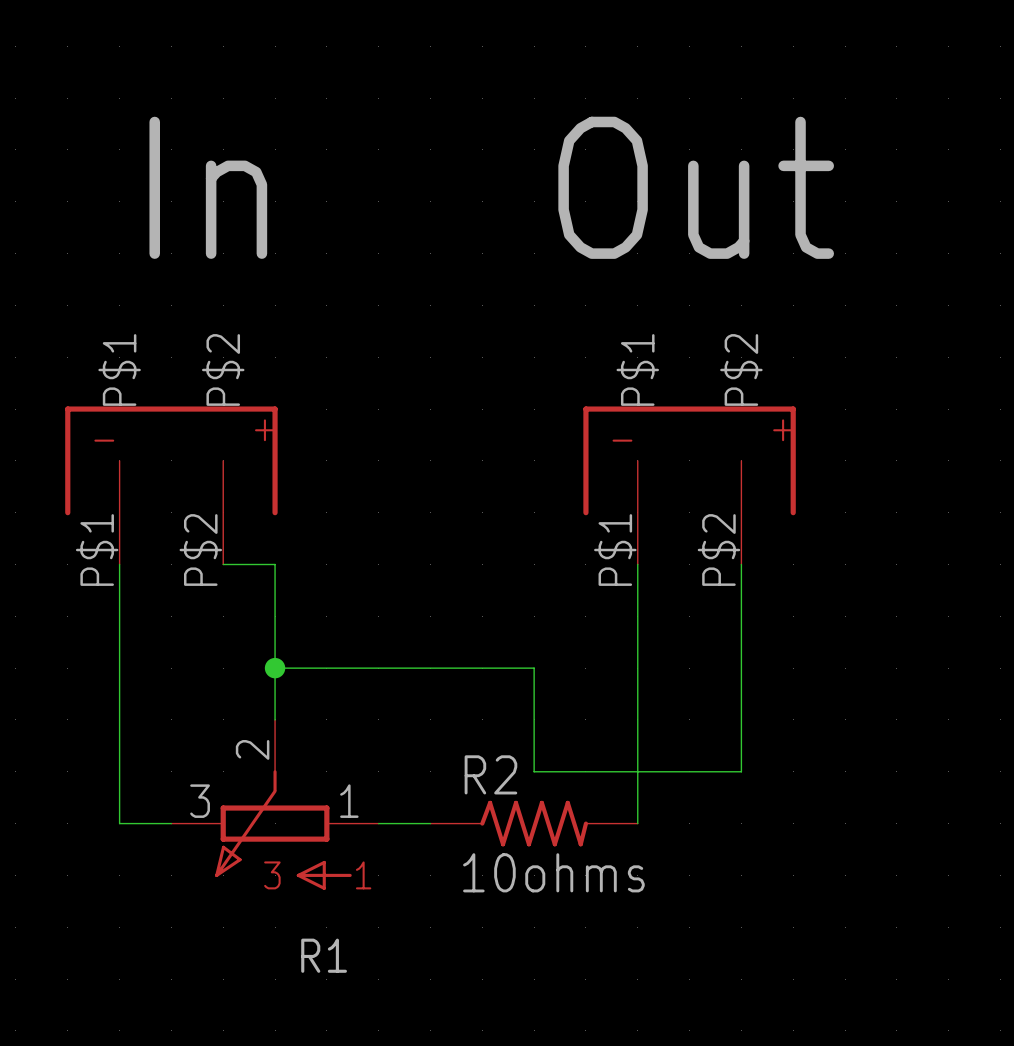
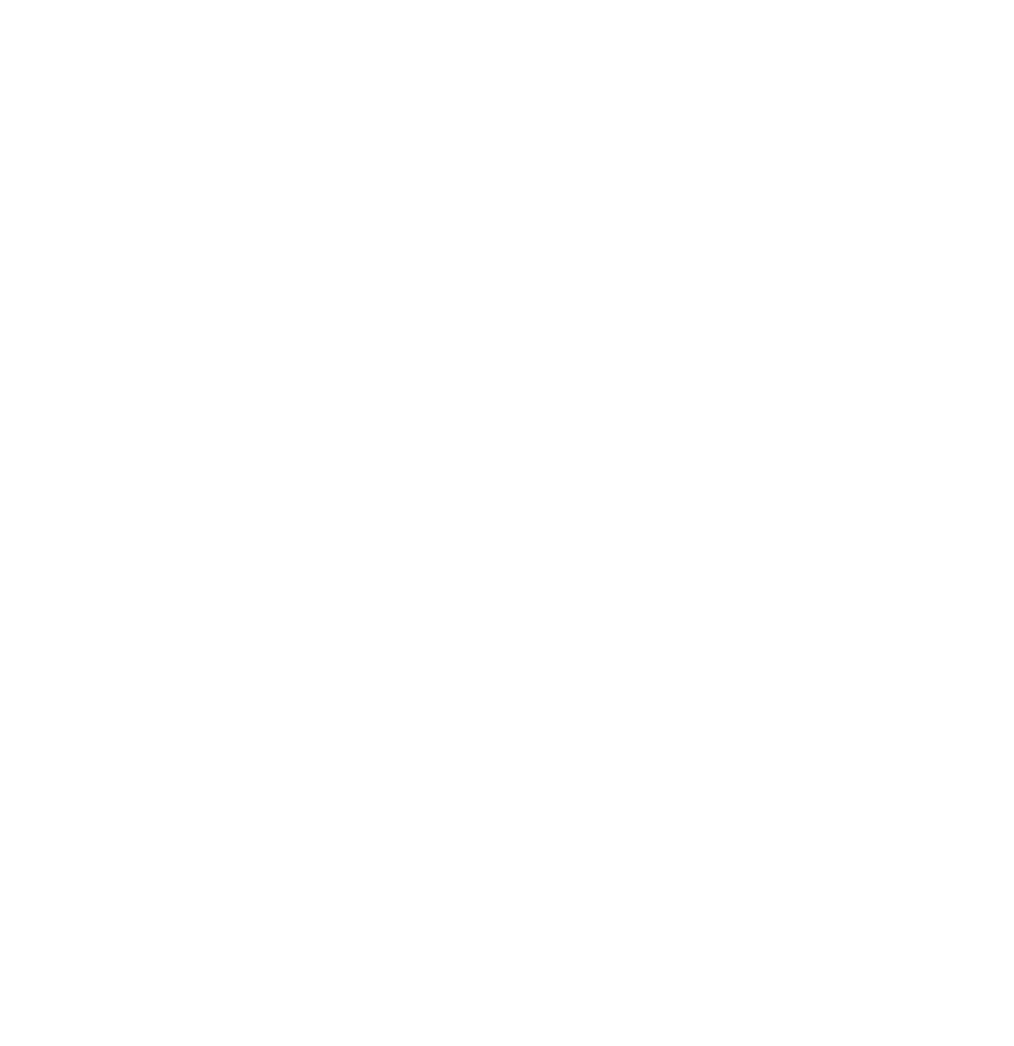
text: In (208, 187) -> none
text: Out (696, 187) -> none
part: (171, 485) -> none
part: (689, 485) -> none
wire: (119, 564) (119, 823) (171, 823) -> none
wire: (223, 564) (275, 564) (275, 719) -> none
wire: (637, 564) (637, 823) -> none
wire: (741, 564) (741, 771) (534, 771) (534, 668) (275, 668) -> none
junction: (275, 668) -> none
R1: (275, 804) -> none
wire: (378, 823) (430, 823) -> none
R2: 10ohms (534, 823) -> none

